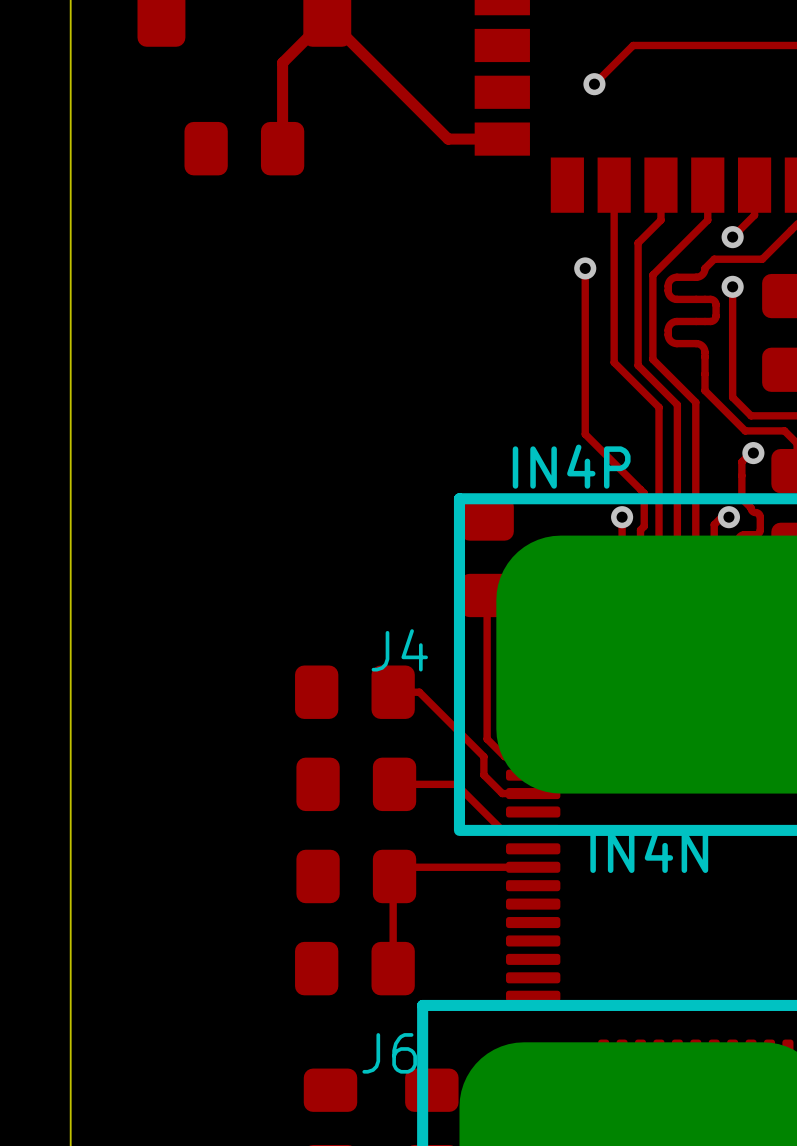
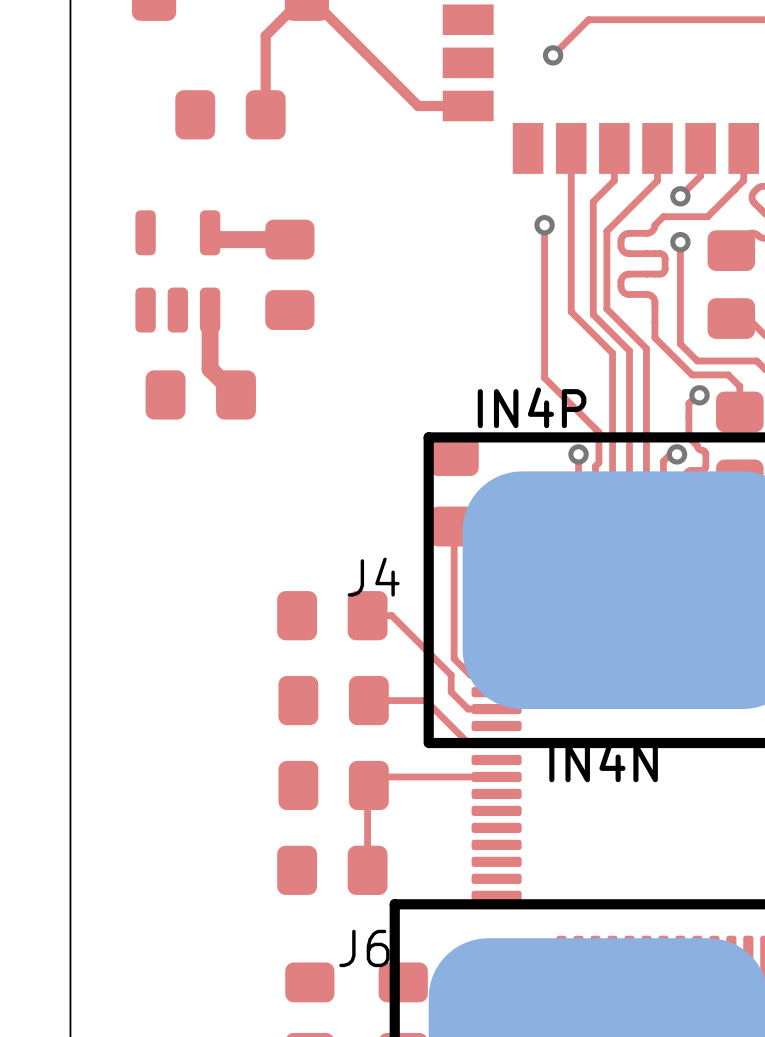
top track: none -> (210, 232) (216, 239) (289, 239)
part: none -> (177, 271)
part: none -> (289, 274)
top track: none -> (210, 310) (210, 369) (235, 394)
part: none -> (200, 394)

